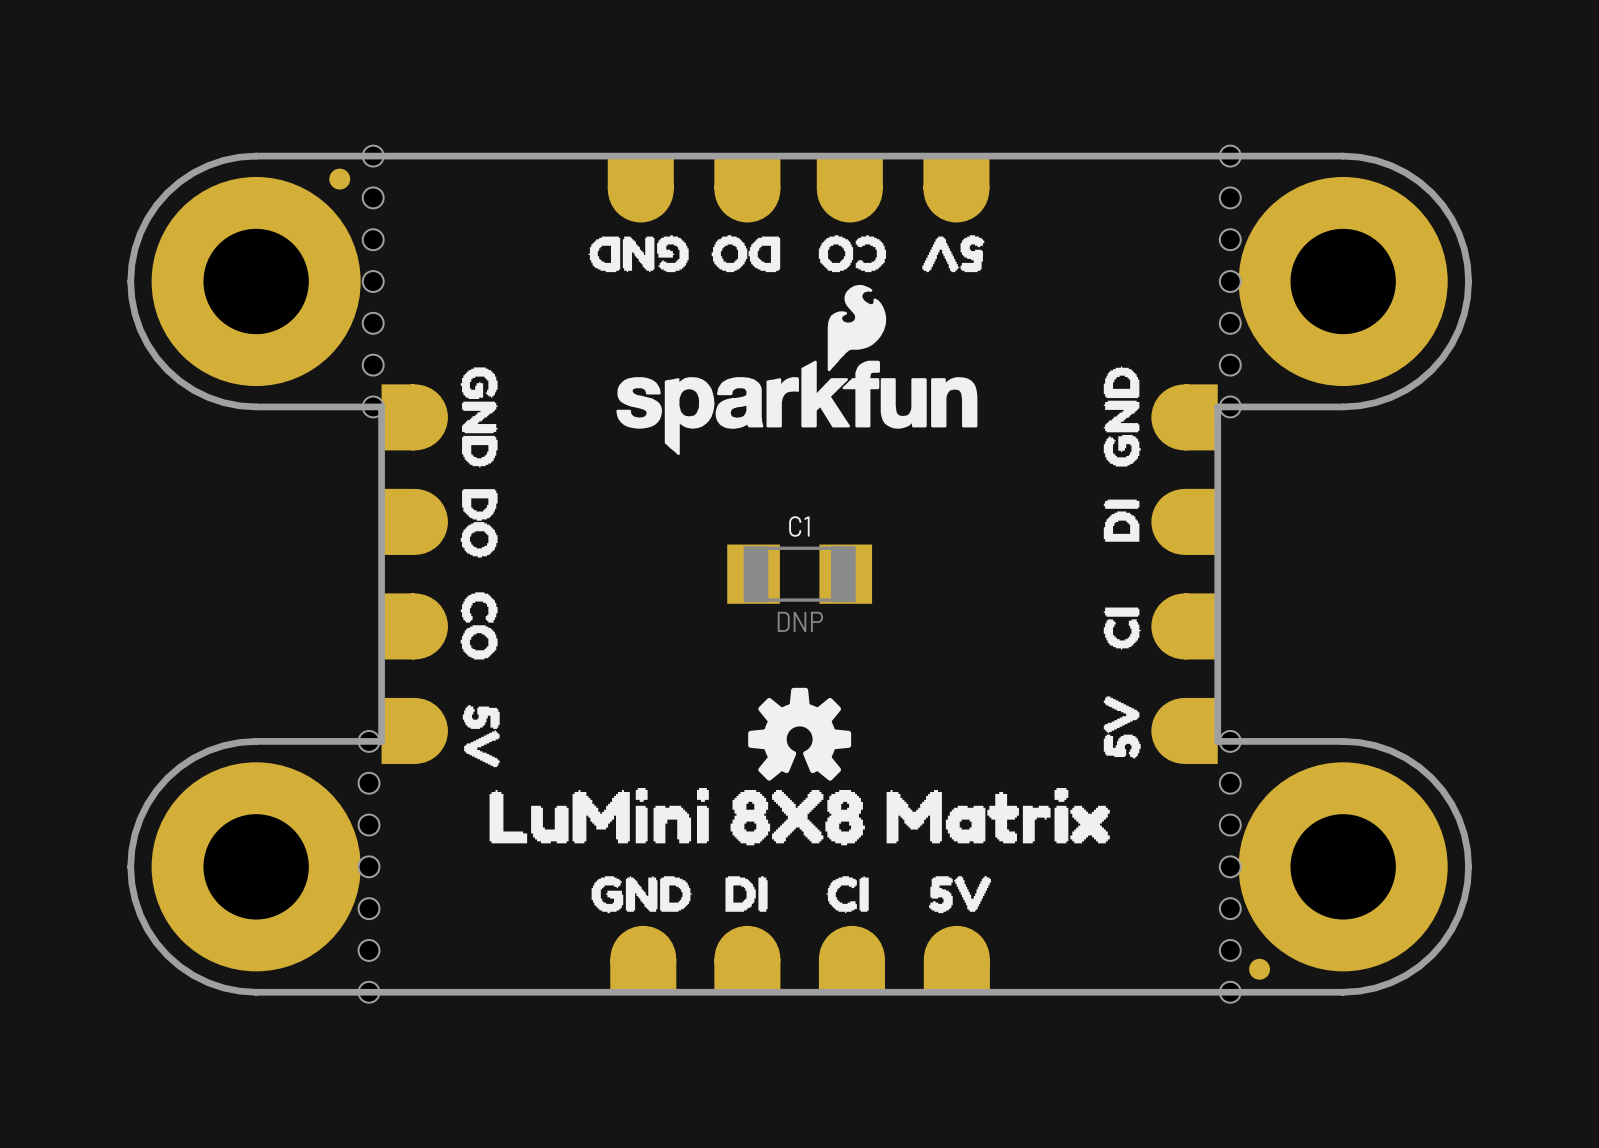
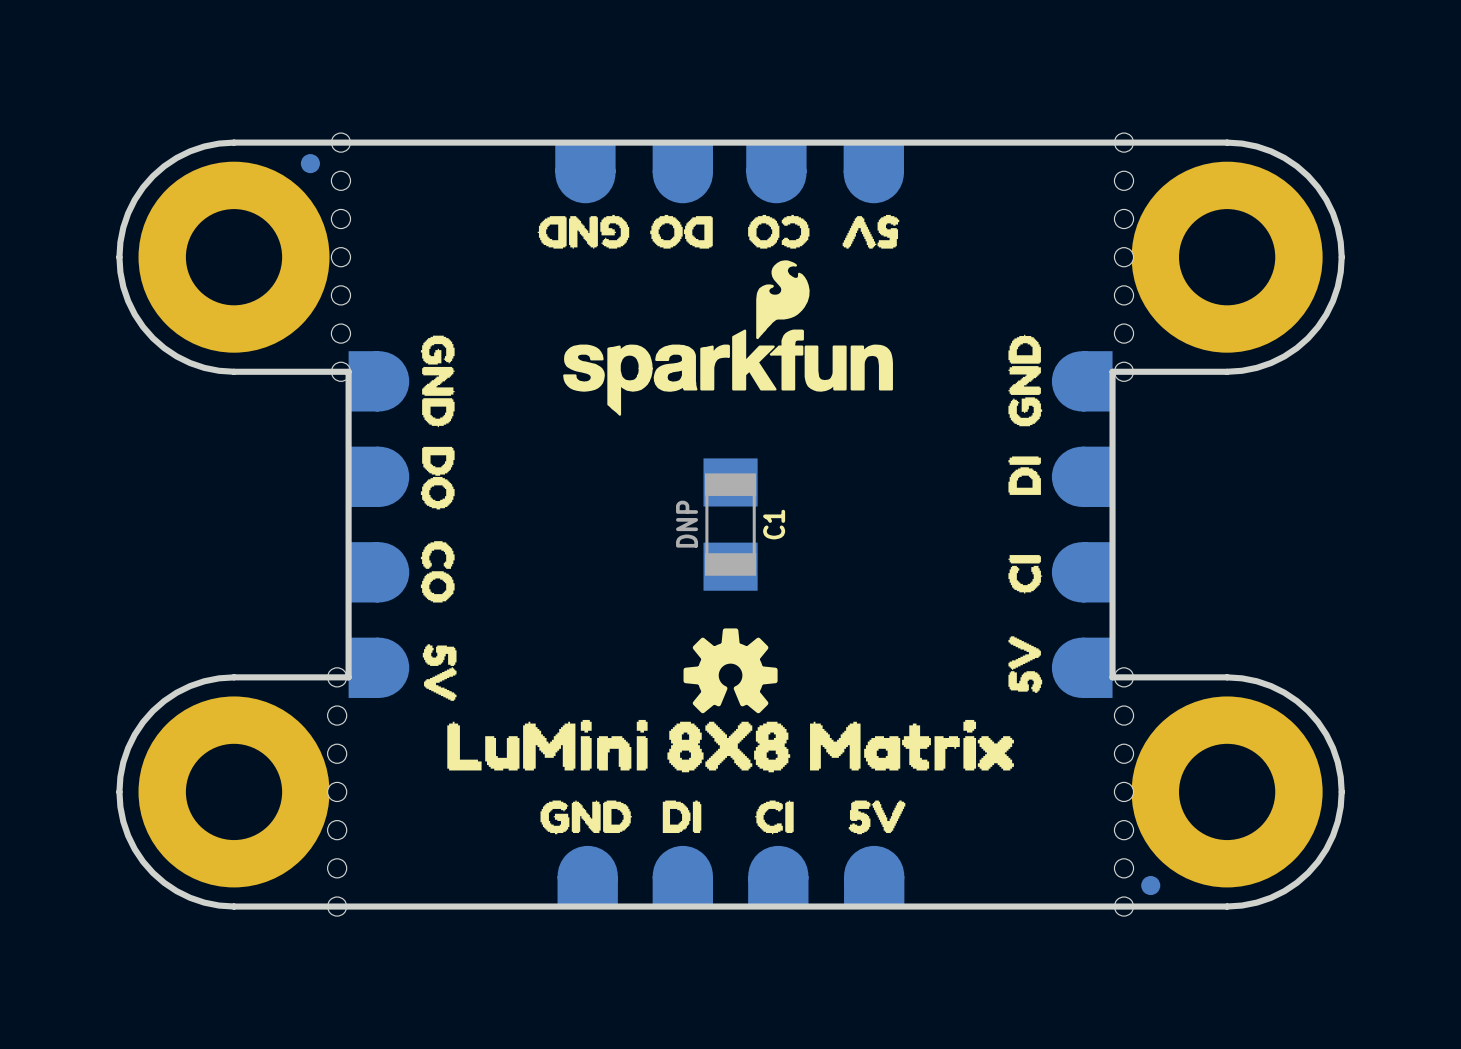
C1 rotation: 0° (799, 574) -> 90° clockwise (730, 524)

